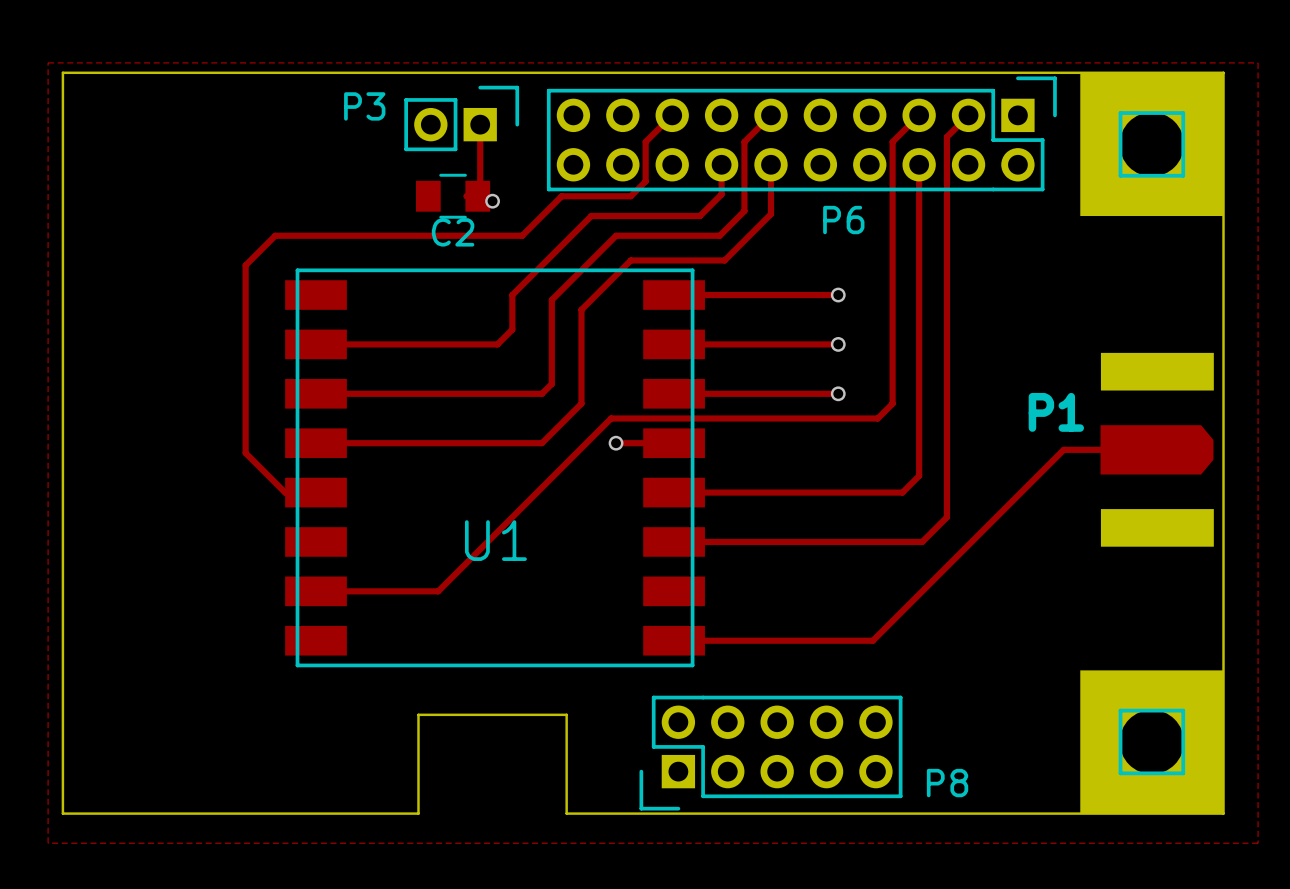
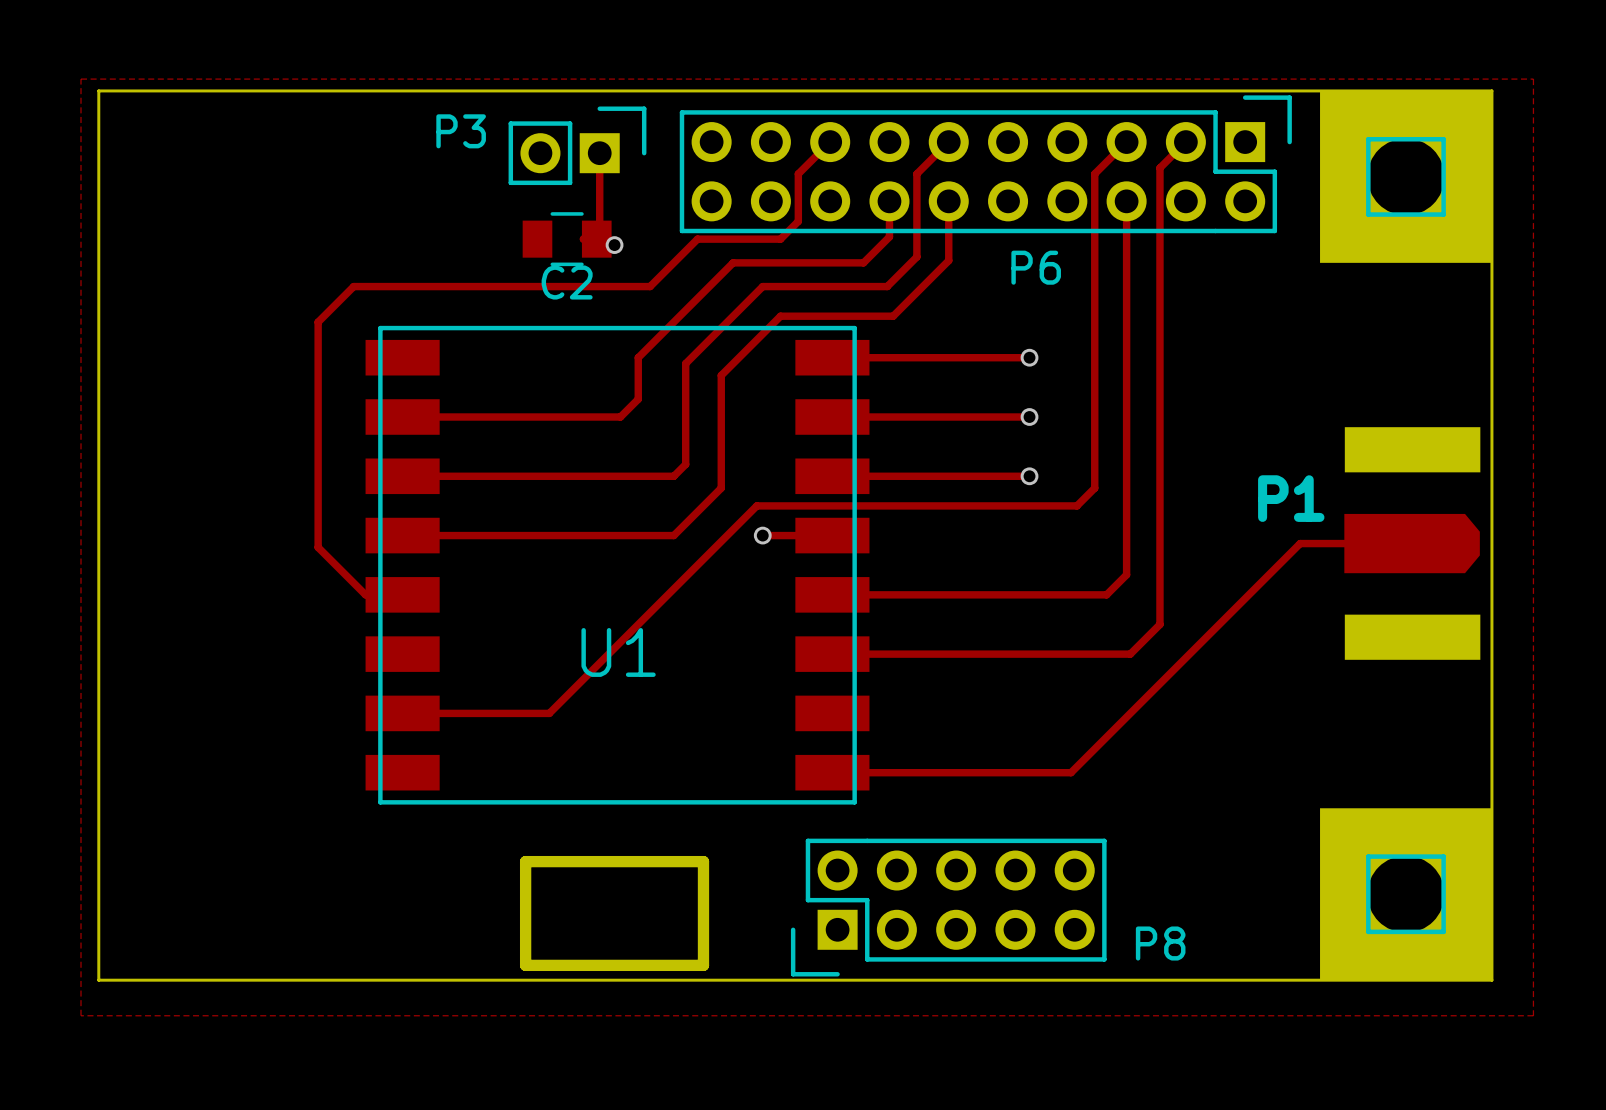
board edge: (418, 801) (418, 813) -> (525, 965) (703, 965)
board edge width: thin (418, 801) (418, 714) (566, 714) (566, 801) -> thick (525, 965) (525, 861) (703, 861) (703, 965)
board edge: (566, 801) (566, 813) -> (525, 980) (703, 980)

